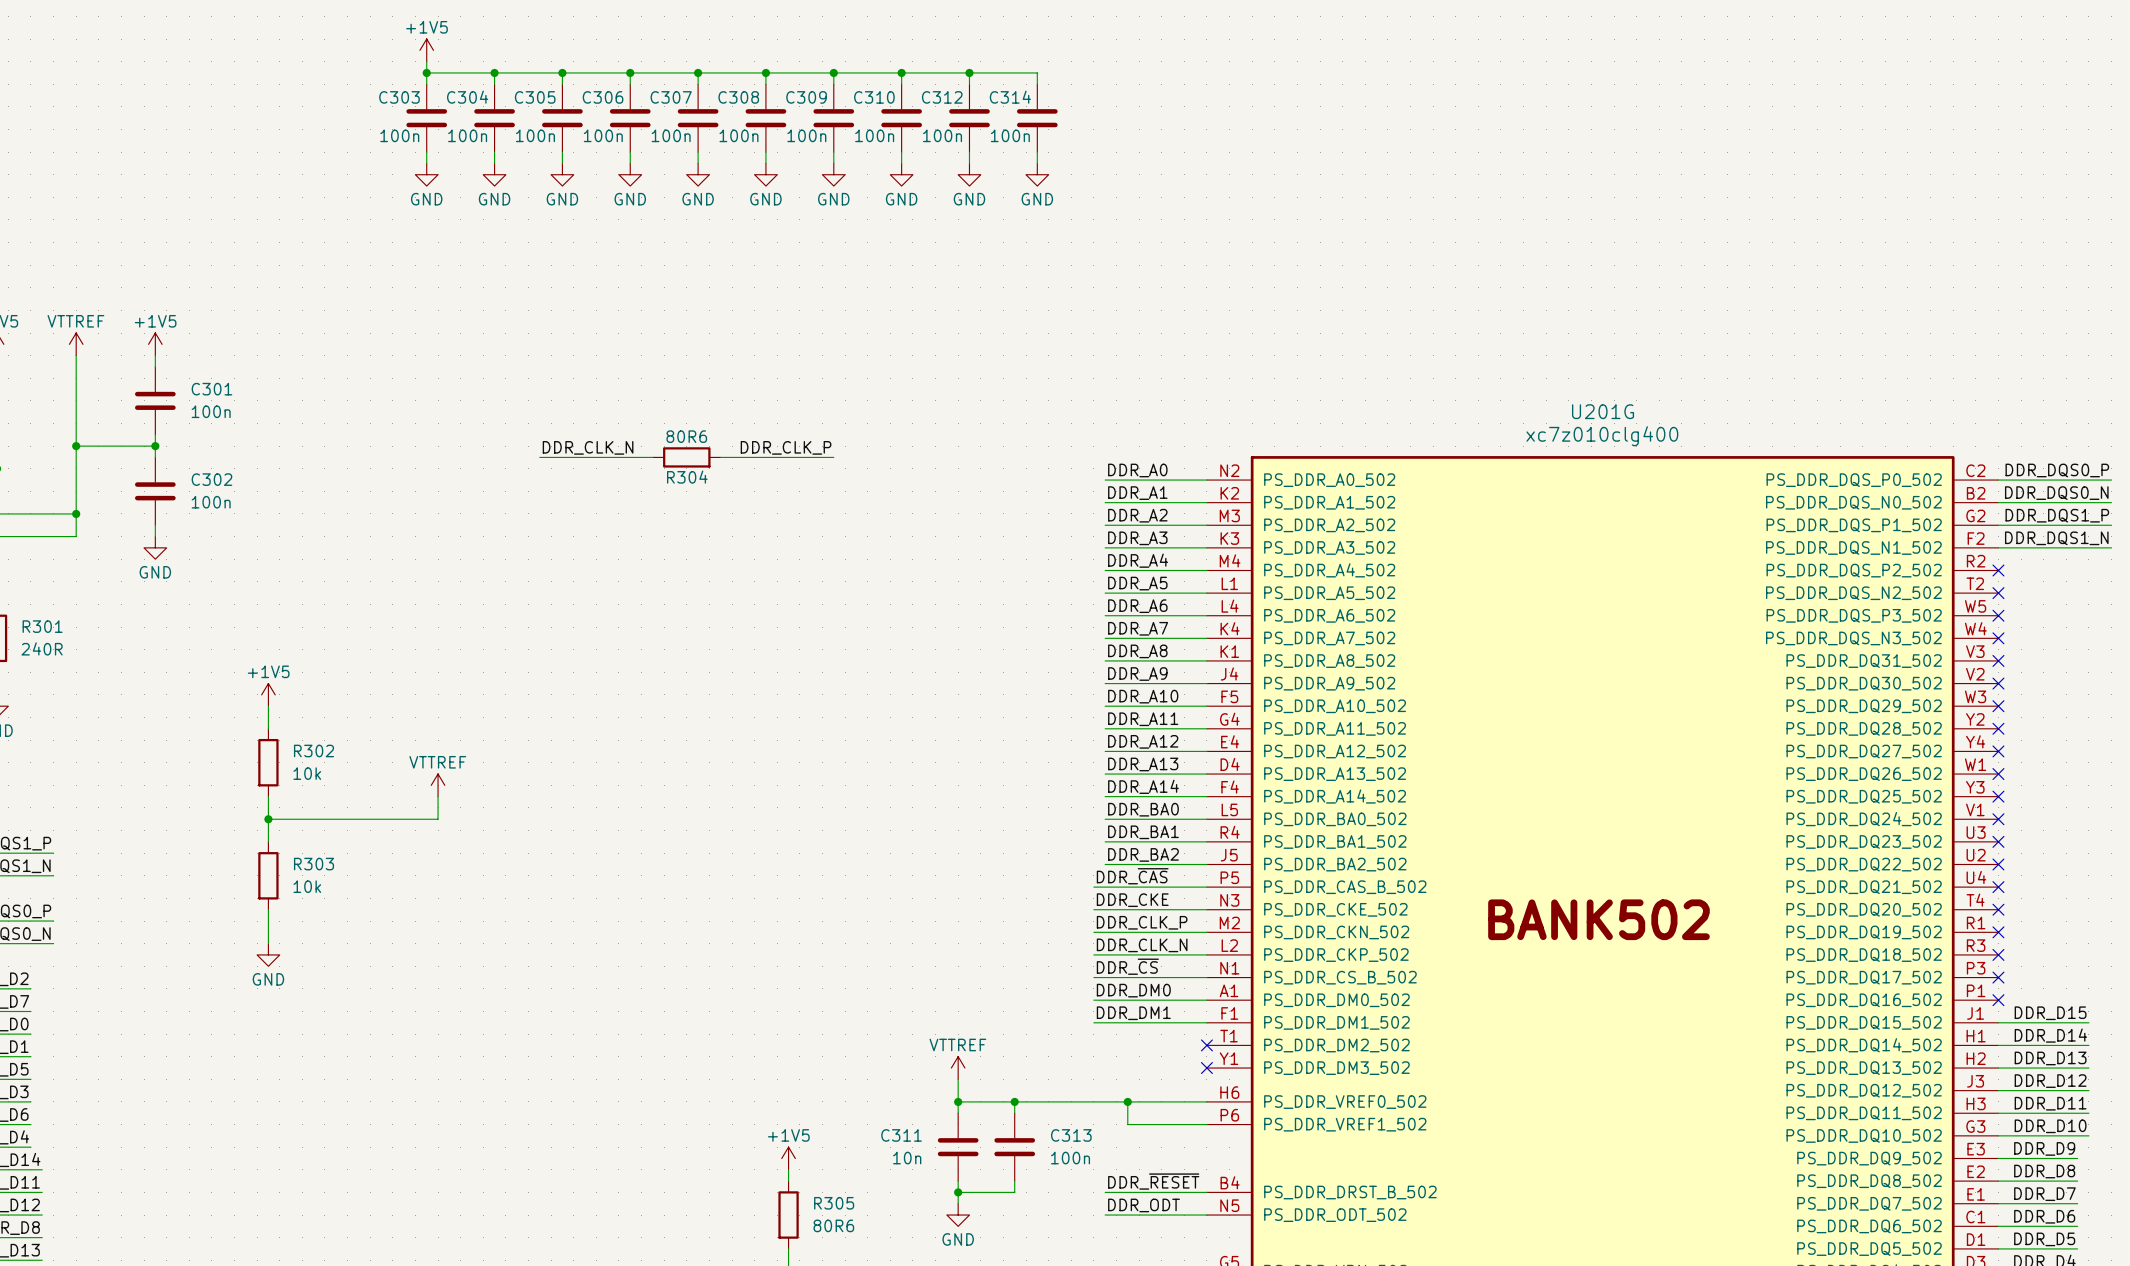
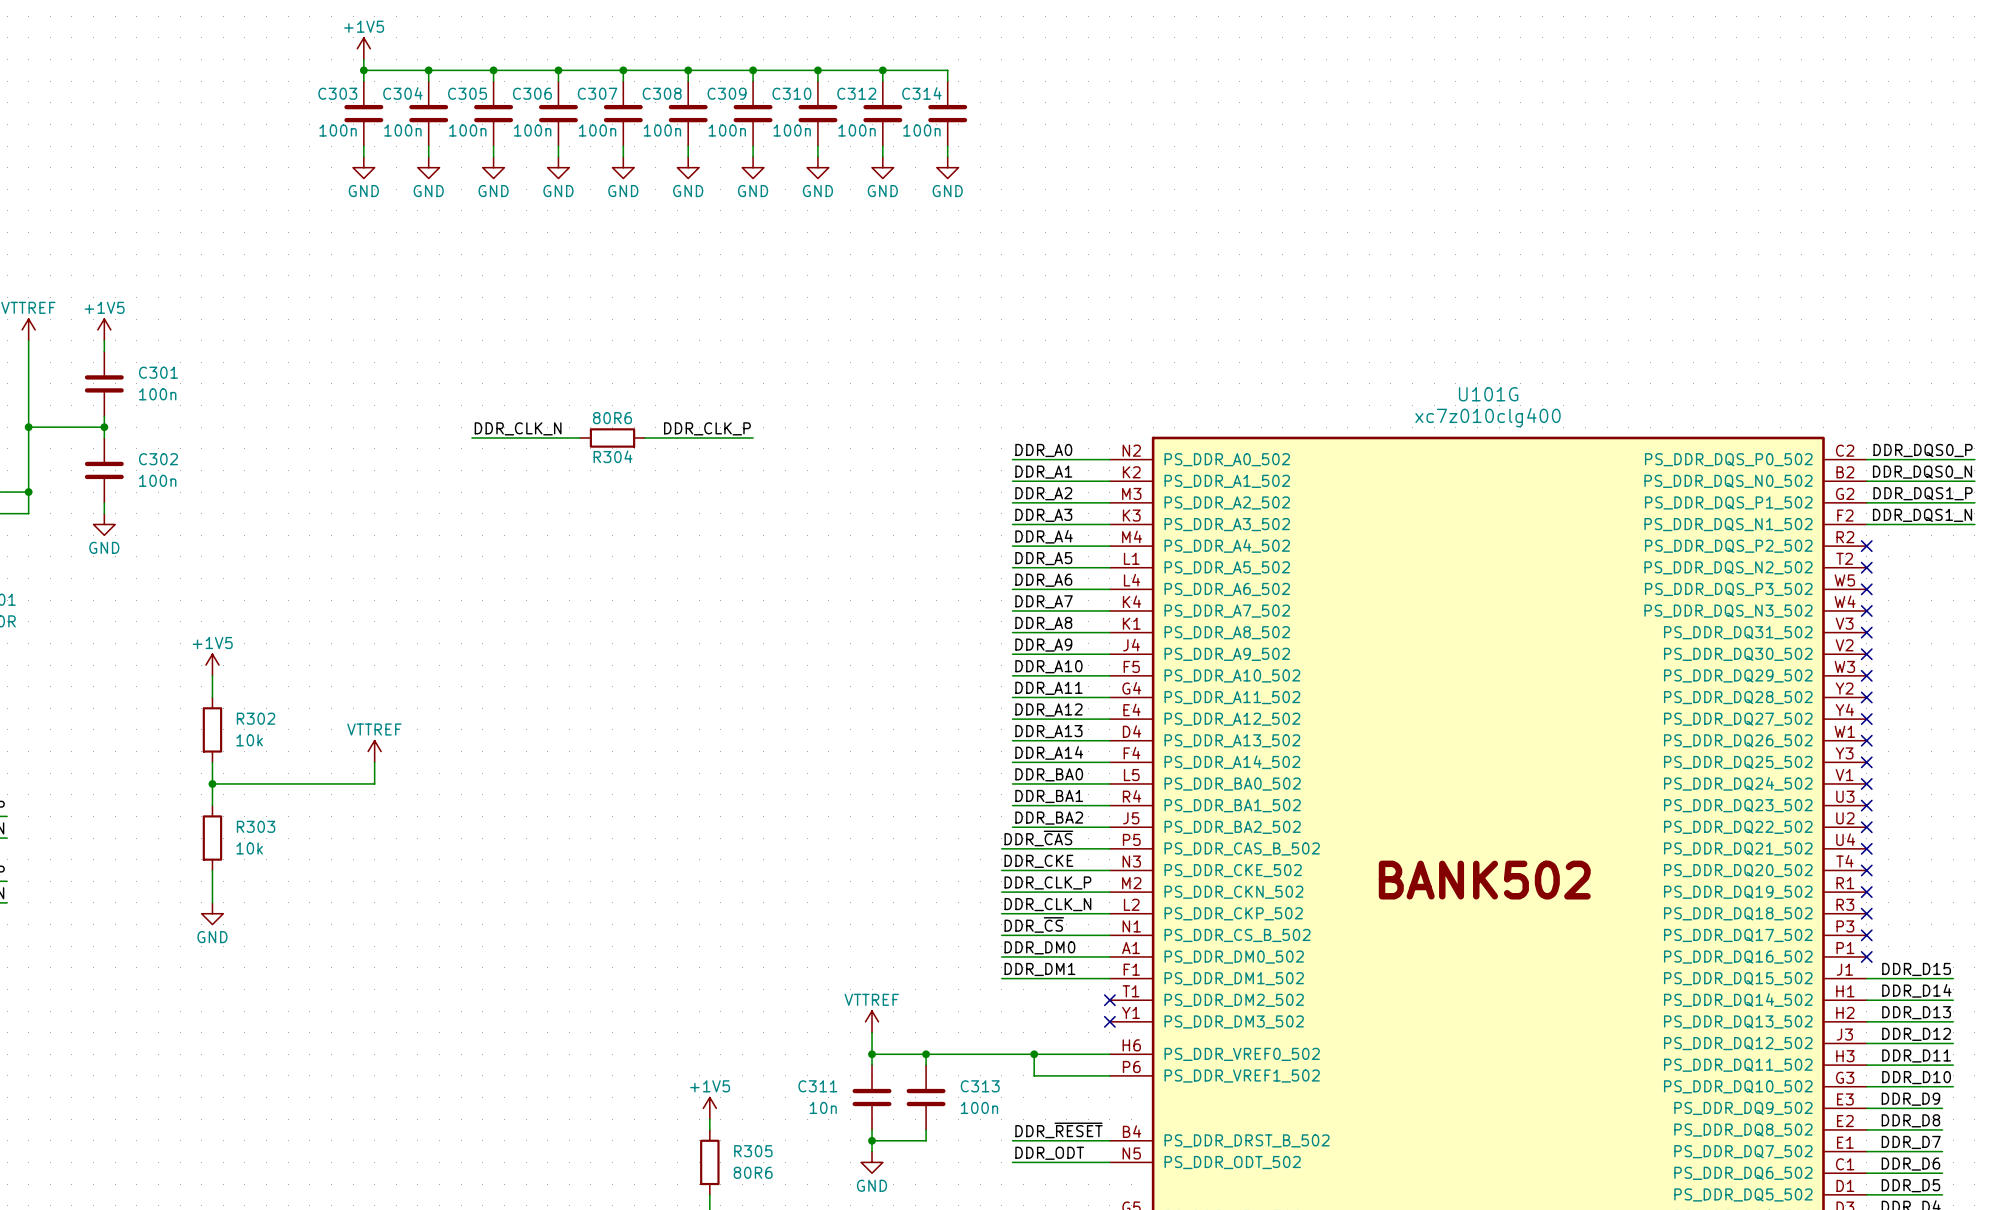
U201G name: U201G (1603, 411) -> U101G (1488, 394)

